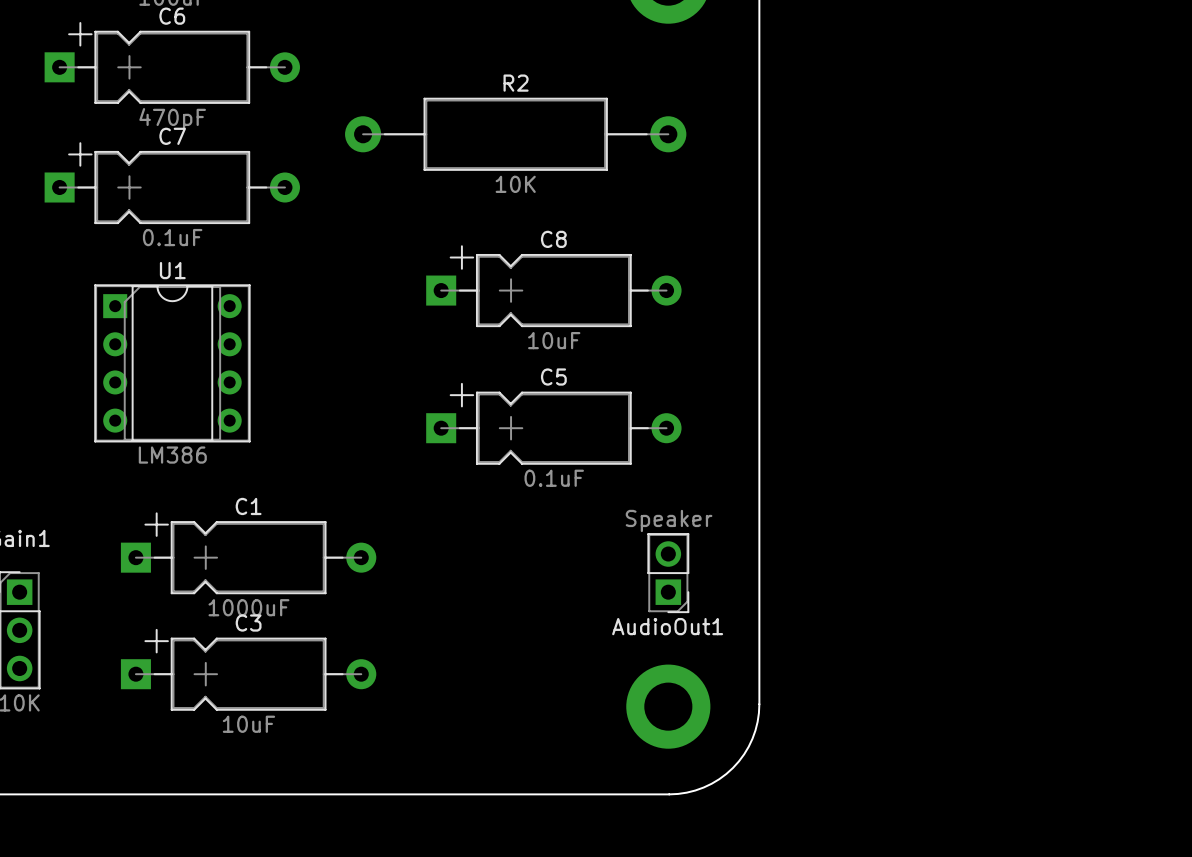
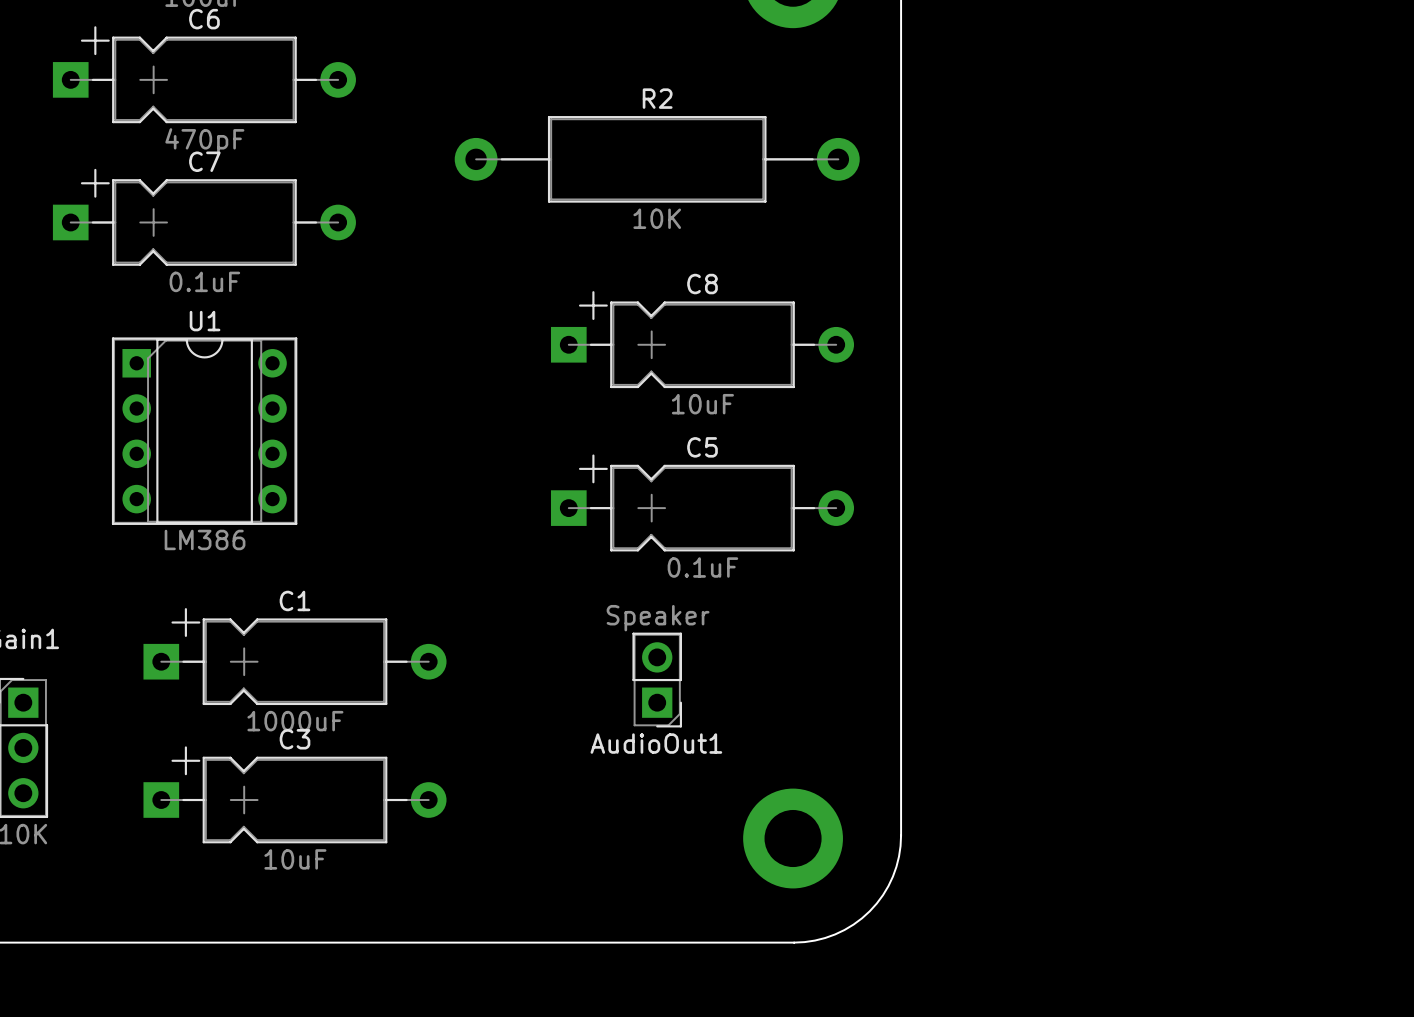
R2 position: (515, 134) -> (657, 159)
C8 position: (553, 286) -> (702, 339)
C5 position: (553, 423) -> (702, 502)
AudioOut1 position: (668, 573) -> (657, 680)

